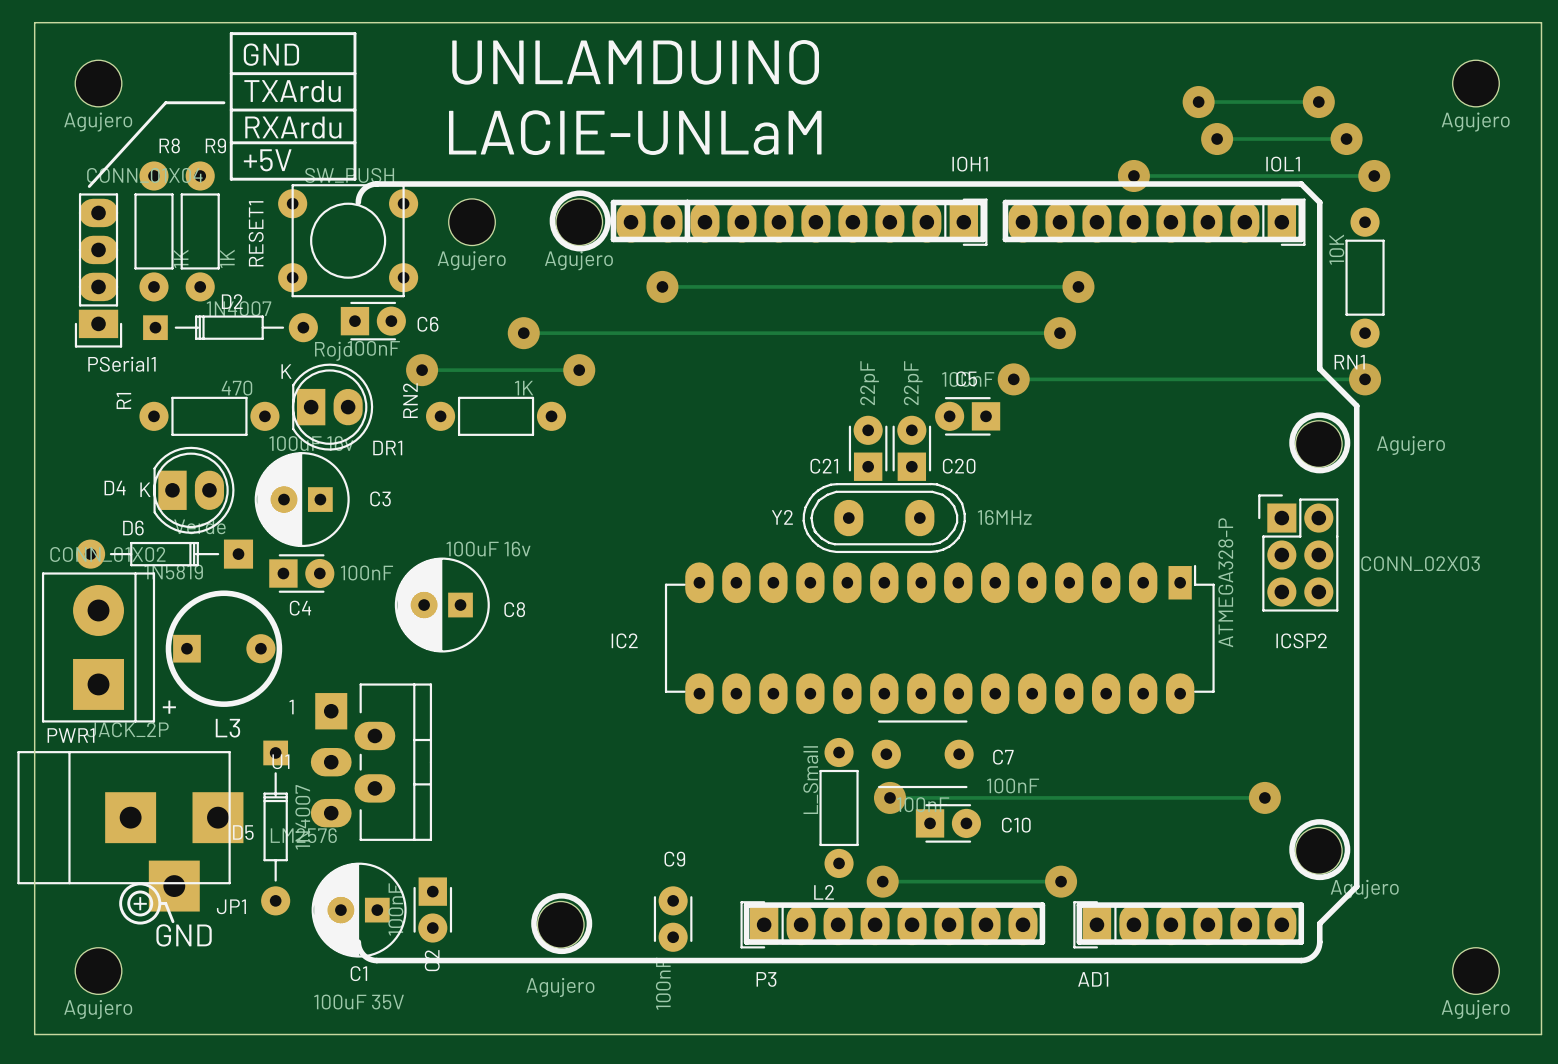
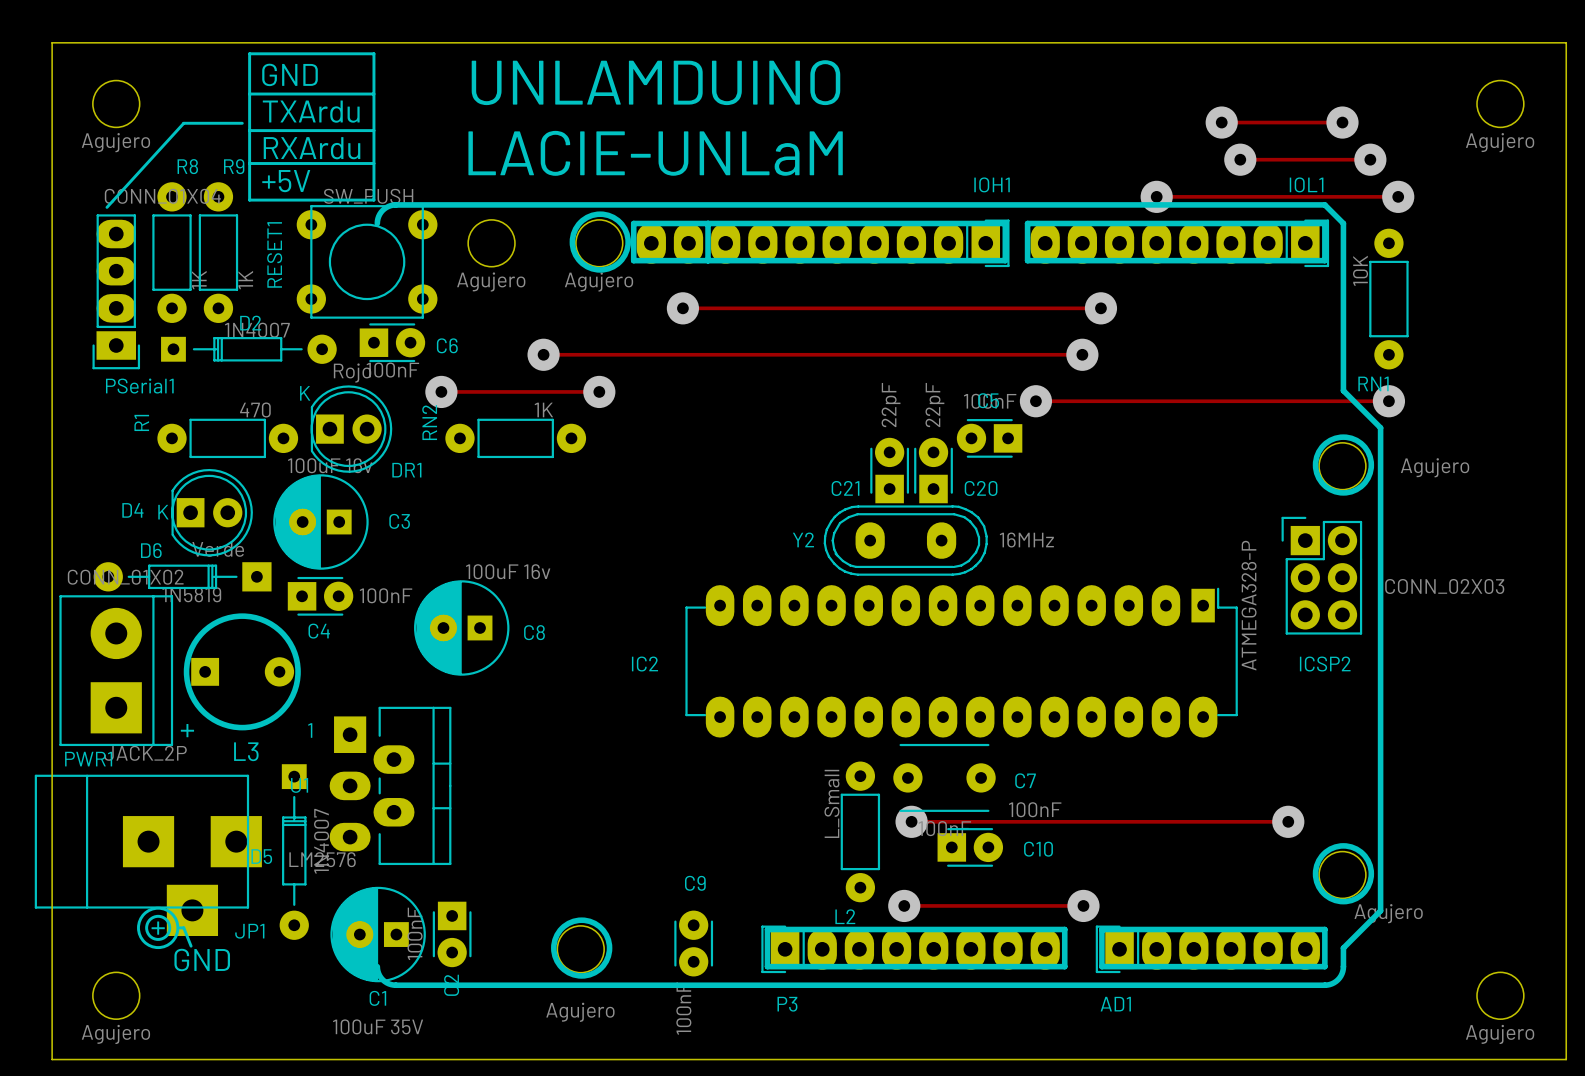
DR1 footprint: [291, 363, 374, 451] -> [310, 385, 393, 473]
D4 footprint: [153, 446, 235, 534] -> [171, 468, 253, 557]

